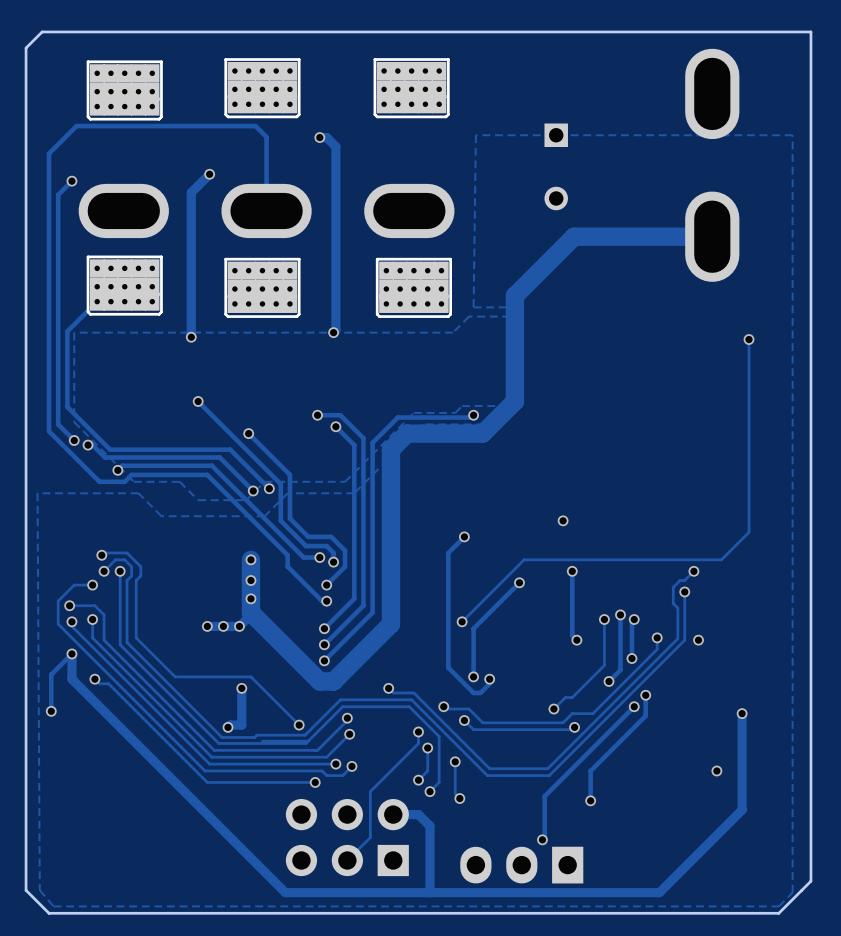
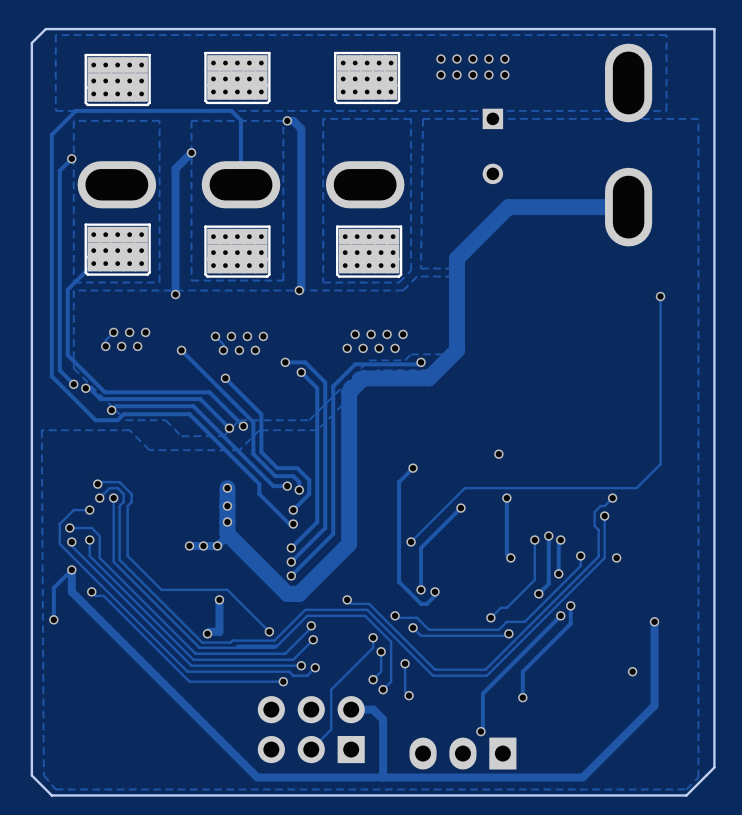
zone outline: none -> (666, 35) (55, 35) (55, 110) (666, 110) (666, 35)
via: none -> (440, 59)
via: none -> (456, 59)
via: none -> (472, 59)
via: none -> (488, 59)
via: none -> (504, 59)
via: none -> (440, 74)
via: none -> (456, 74)
via: none -> (472, 74)
via: none -> (488, 74)
via: none -> (504, 74)
zone outline: none -> (411, 118) (323, 118) (323, 282) (399, 282) (411, 270) (411, 118)
zone outline: none -> (159, 120) (73, 120) (73, 282) (159, 282) (159, 120)
zone outline: none -> (283, 120) (191, 120) (191, 280) (283, 280) (283, 120)
track: none -> (113, 332) (105, 340) (105, 346)
via: none -> (113, 332)
via: none -> (129, 332)
via: none -> (145, 332)
via: none -> (355, 334)
via: none -> (371, 334)
via: none -> (387, 334)
via: none -> (403, 334)
track: none -> (215, 336) (223, 344) (223, 350)
via: none -> (215, 336)
via: none -> (231, 336)
via: none -> (247, 336)
via: none -> (263, 336)
via: none -> (105, 346)
via: none -> (121, 346)
via: none -> (137, 346)
via: none -> (347, 348)
via: none -> (363, 348)
via: none -> (379, 348)
via: none -> (395, 348)
via: none -> (223, 350)
via: none -> (239, 350)
via: none -> (255, 350)

